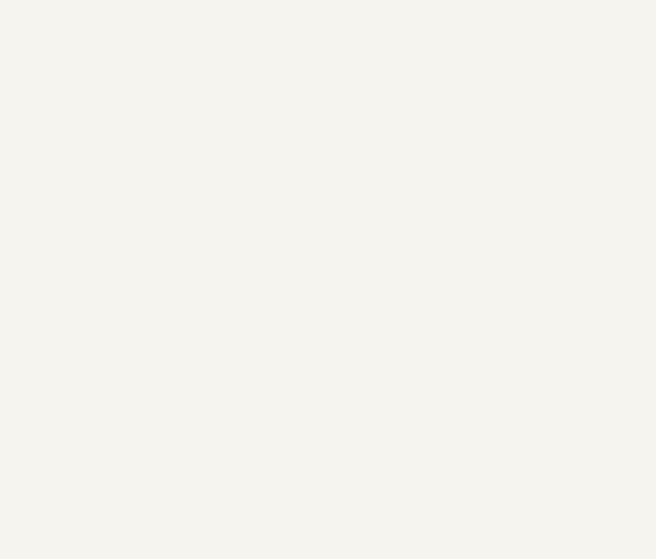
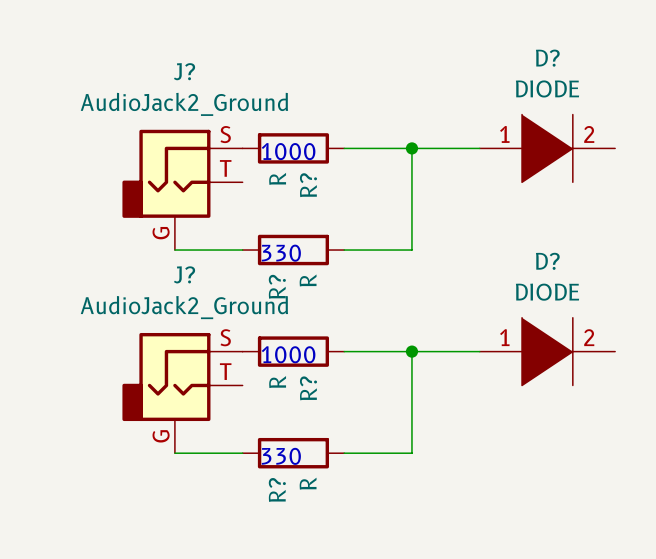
R?: none -> R (293, 148)
wire: none -> (344, 148) (479, 148)
wire: none -> (411, 148) (411, 250) (344, 250)
junction: none -> (411, 148)
D?: none -> DIODE (547, 148)
text: none -> 1000 (288, 151)
J?: none -> AudioJack2_Ground (182, 189)
wire: none -> (174, 250) (242, 250)
R?: none -> R (293, 250)
text: none -> 330 (281, 253)
R?: none -> R (293, 351)
wire: none -> (344, 351) (479, 351)
wire: none -> (411, 351) (411, 453) (344, 453)
junction: none -> (411, 351)
D?: none -> DIODE (547, 351)
text: none -> 1000 (288, 354)
J?: none -> AudioJack2_Ground (182, 393)
wire: none -> (174, 453) (242, 453)
R?: none -> R (293, 453)
text: none -> 330 (281, 456)

